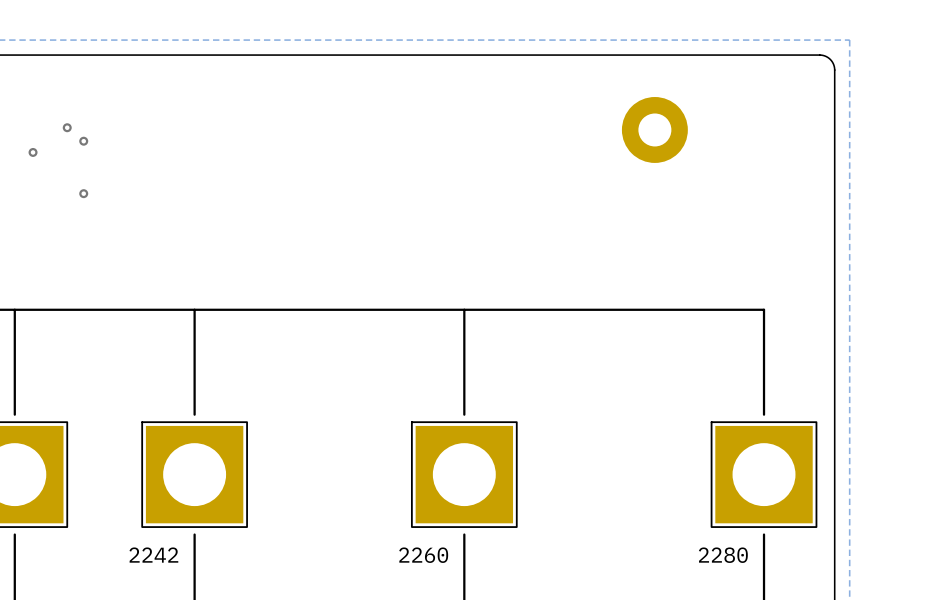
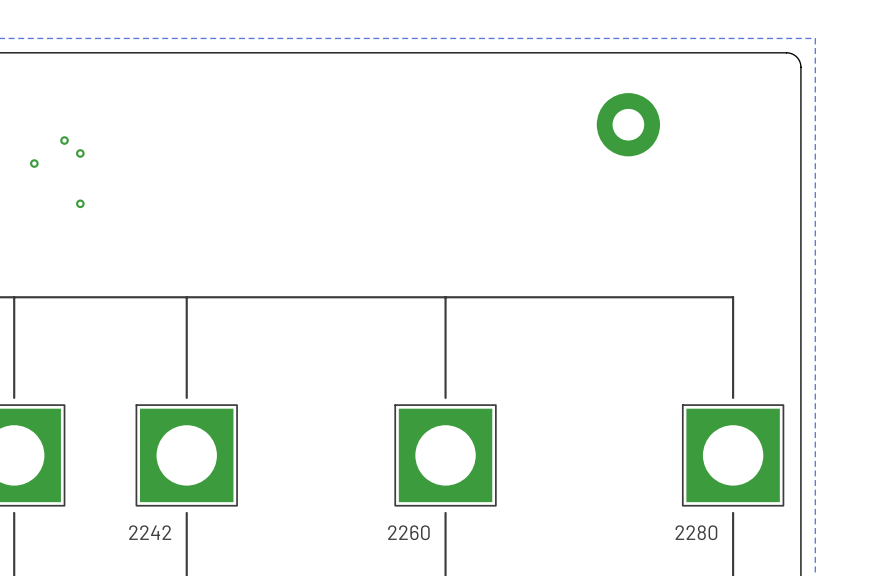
via: (67, 127) -> none
via: (83, 141) -> none
via: none -> (64, 140)
via: (33, 152) -> none
via: none -> (80, 153)
via: none -> (34, 163)
via: (83, 193) -> none
via: none -> (80, 203)

